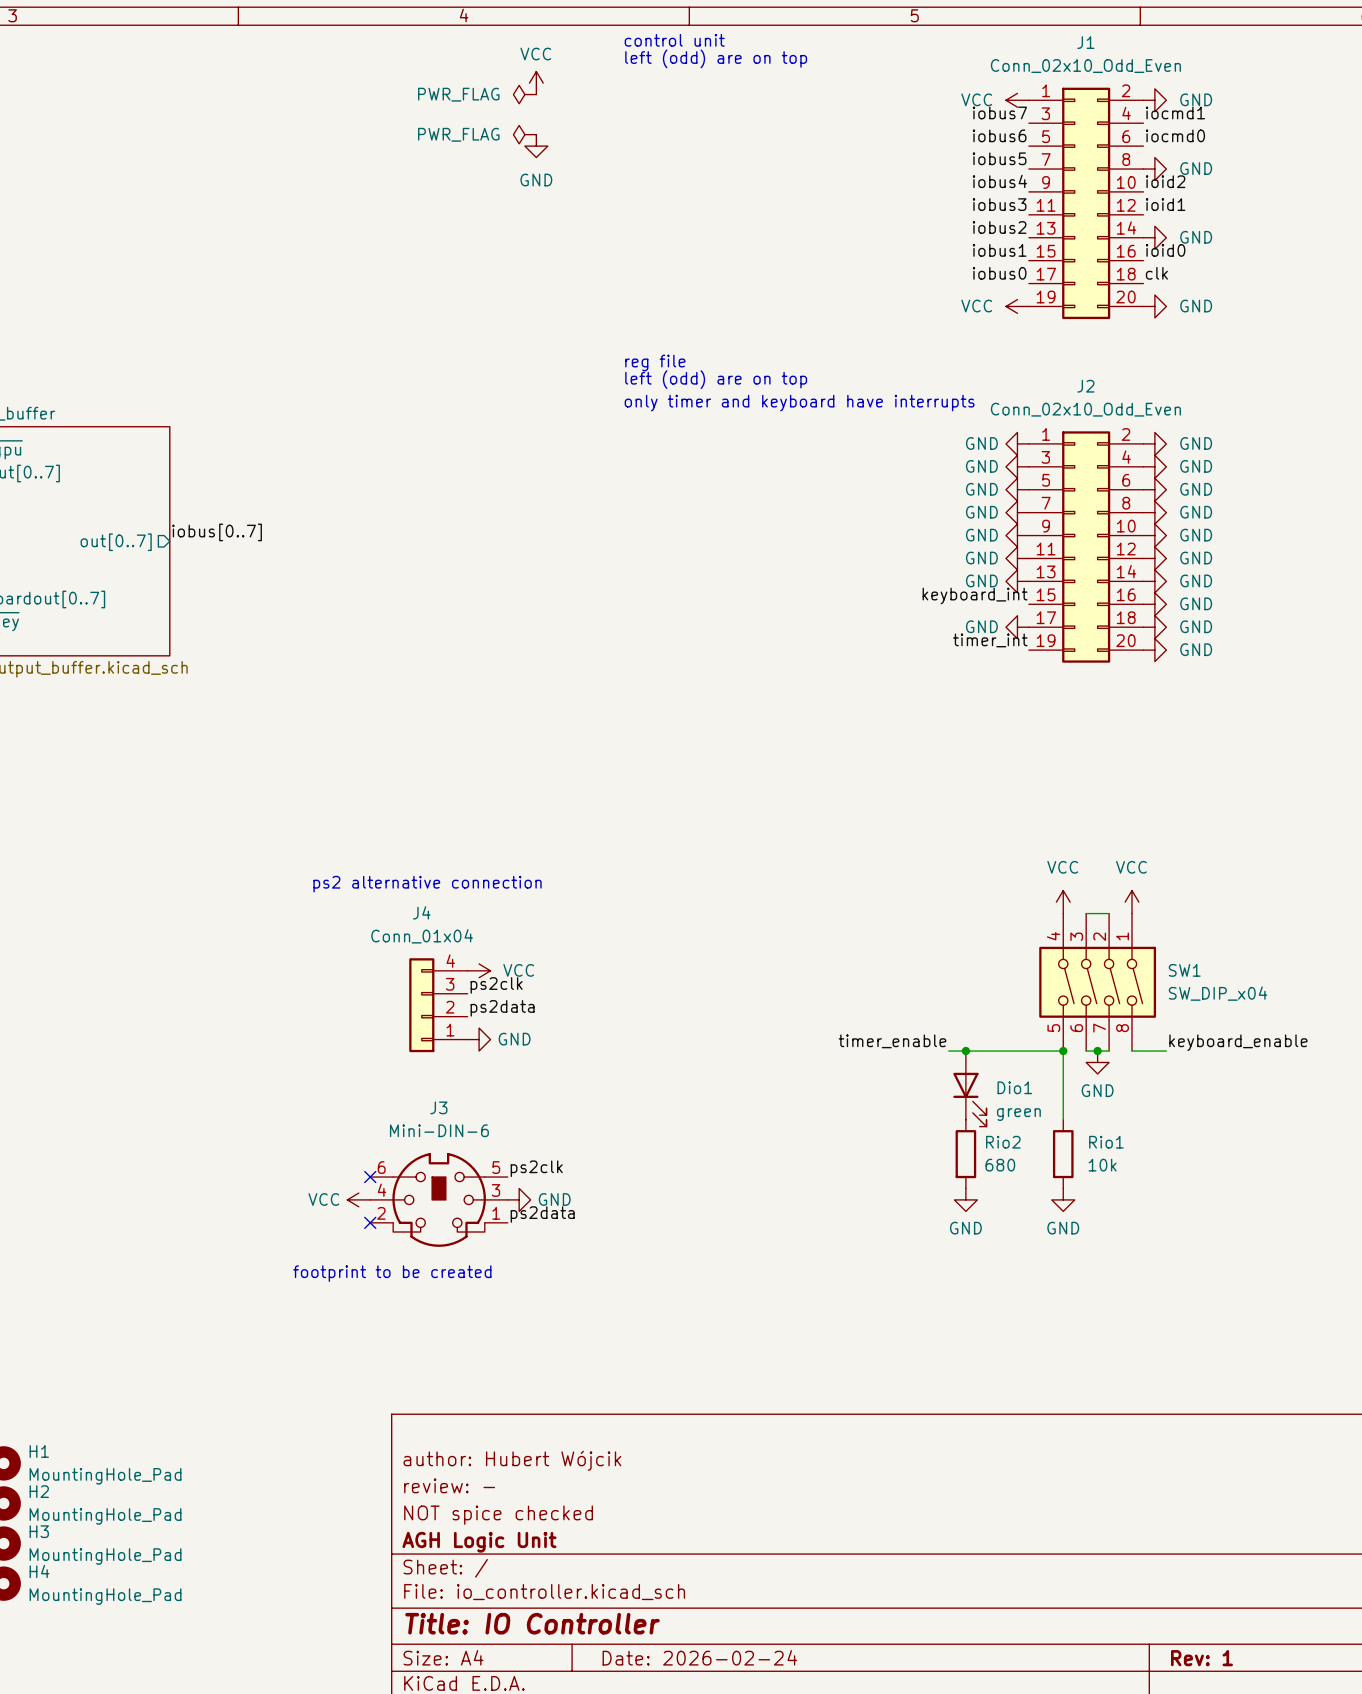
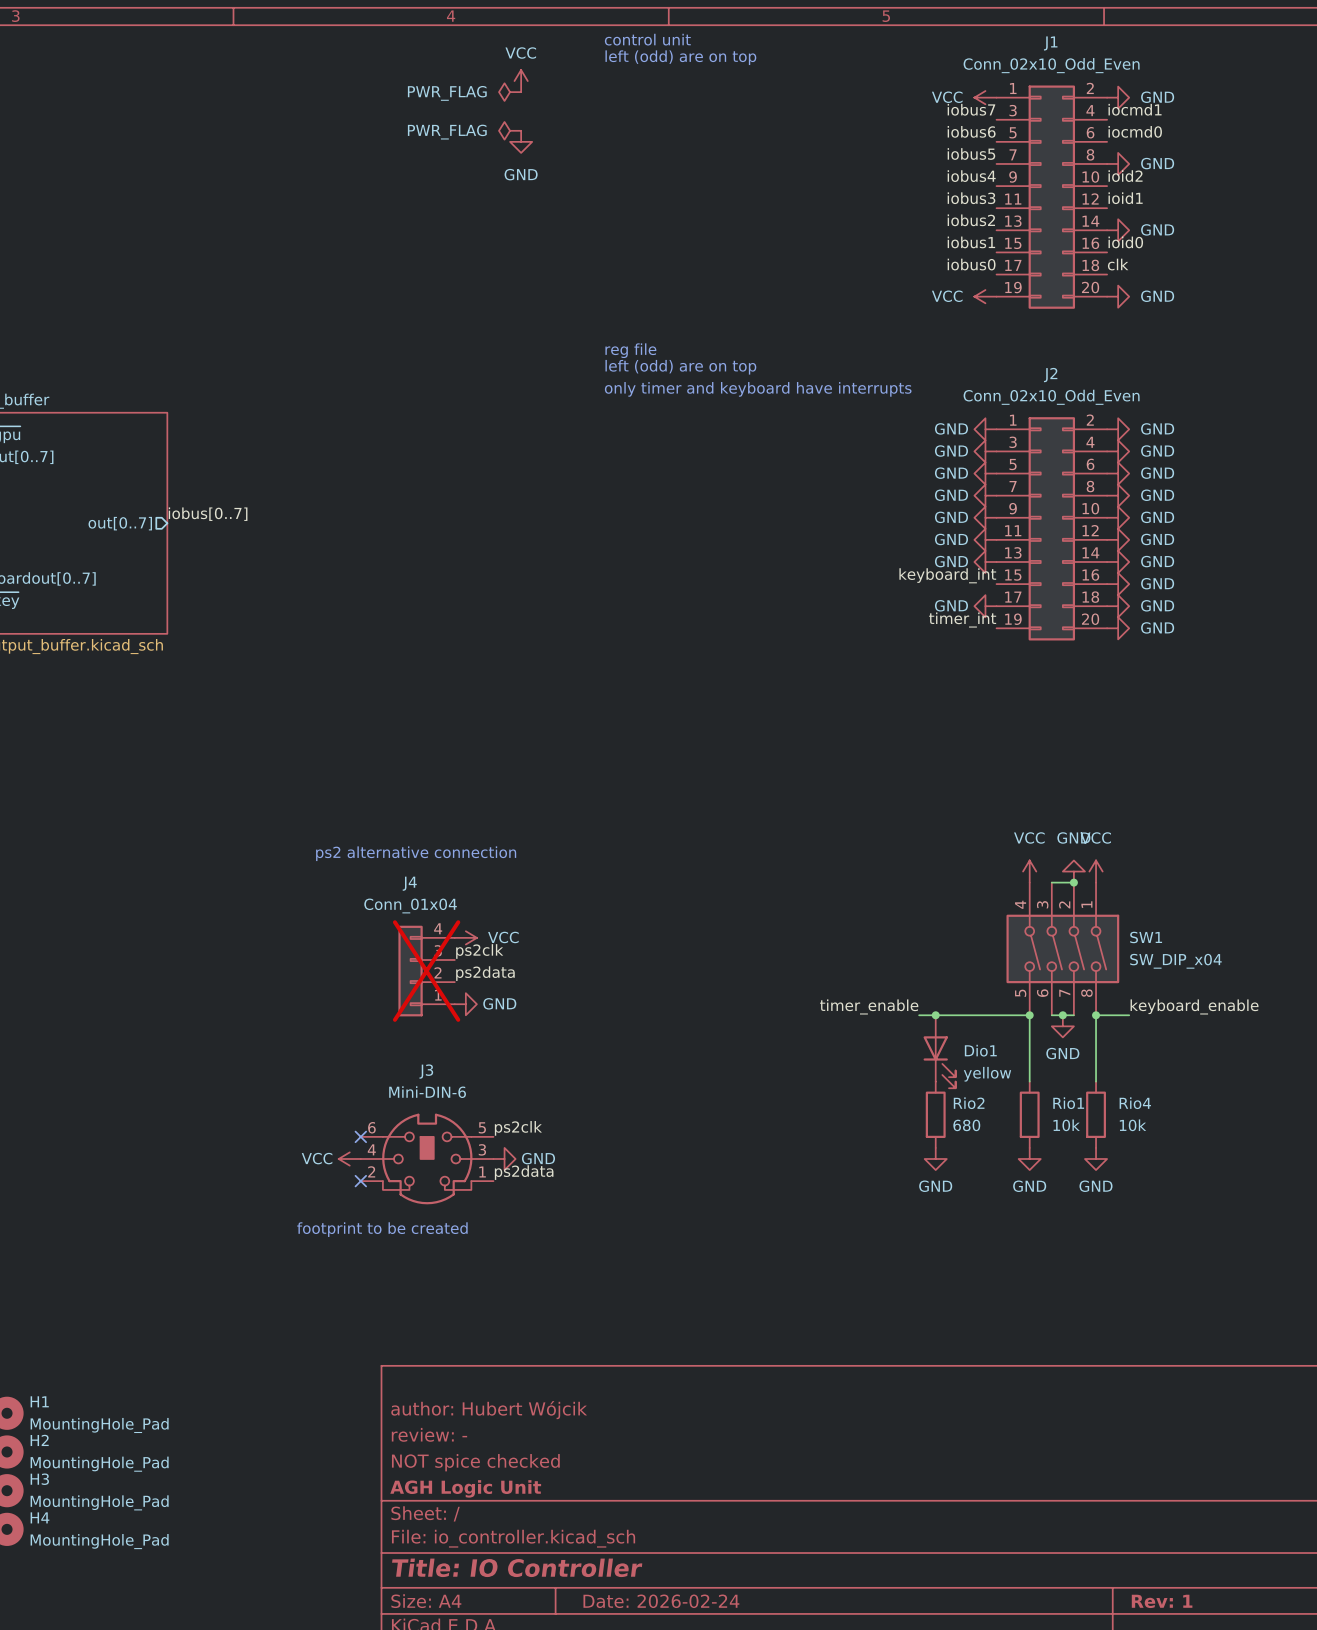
power symbol: none -> GND (1073, 871)
junction: none -> (1073, 882)
J4 do-not-place cross: none -> (426, 971)
wire: none -> (1096, 1015) (1096, 1081)
junction: none -> (1096, 1015)
Dio1 value: green (1018, 1114) -> yellow (987, 1074)
Rio4: none -> 10k (1096, 1114)
power symbol: none -> GND (1096, 1159)

